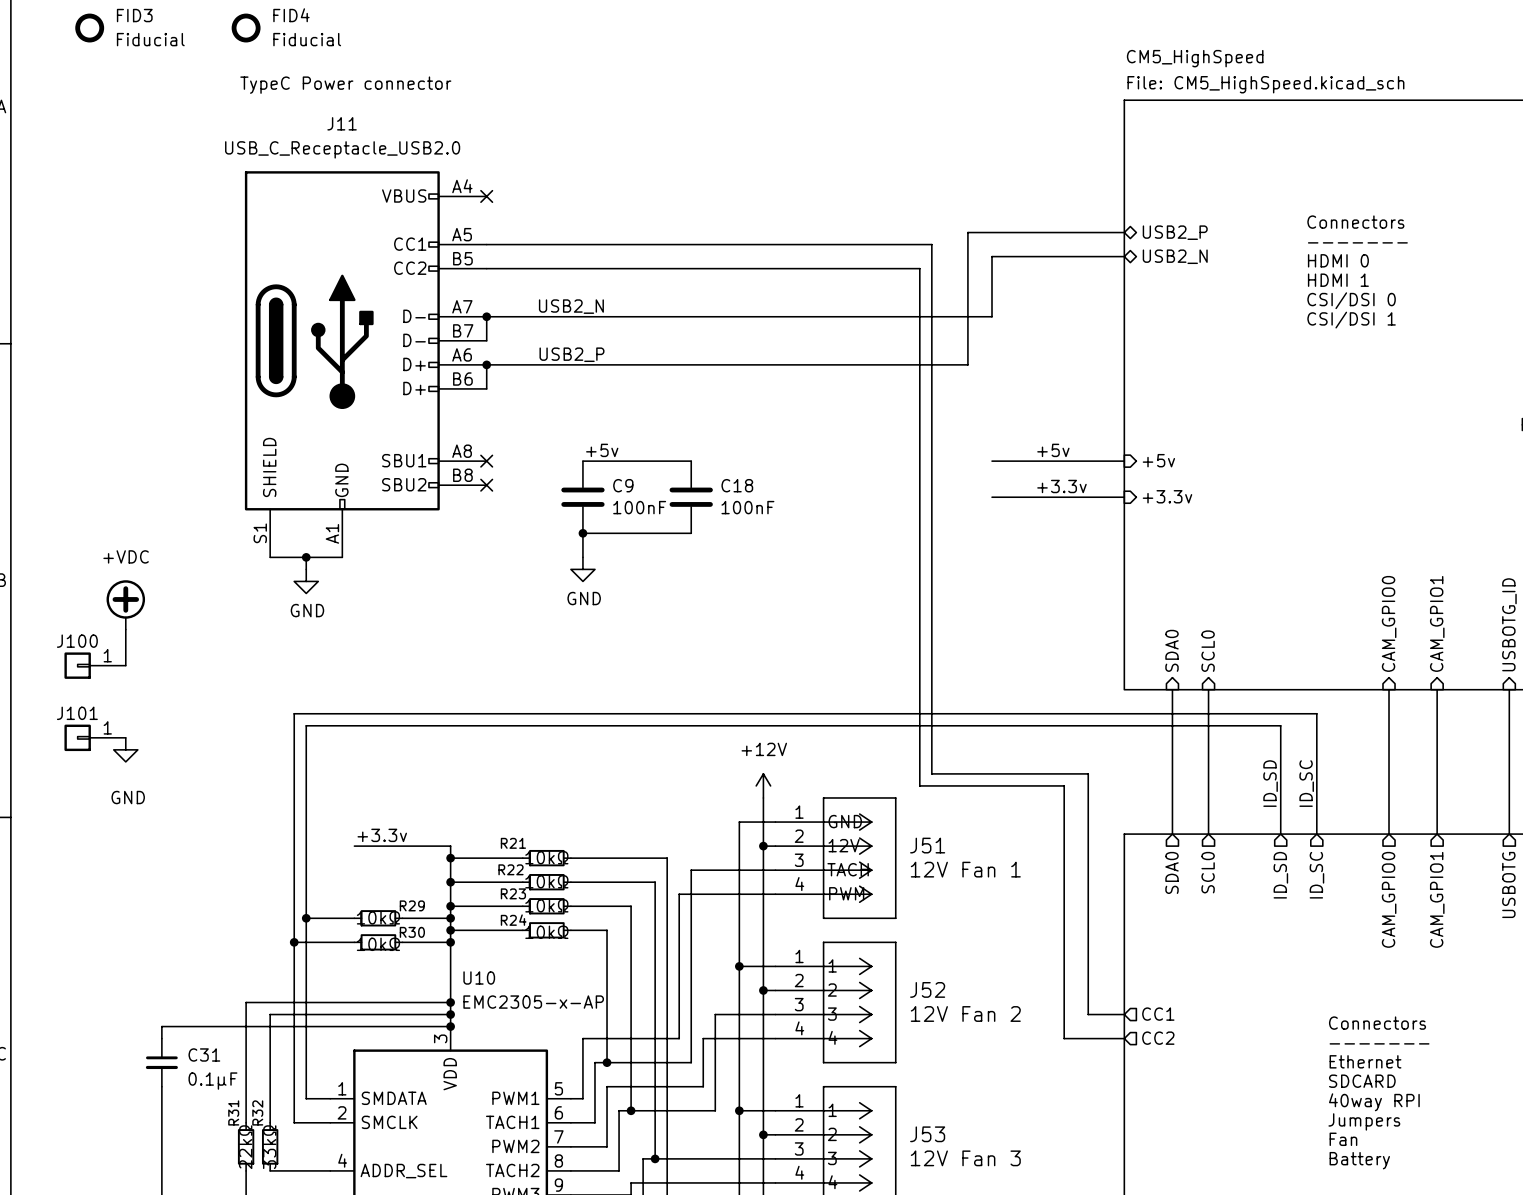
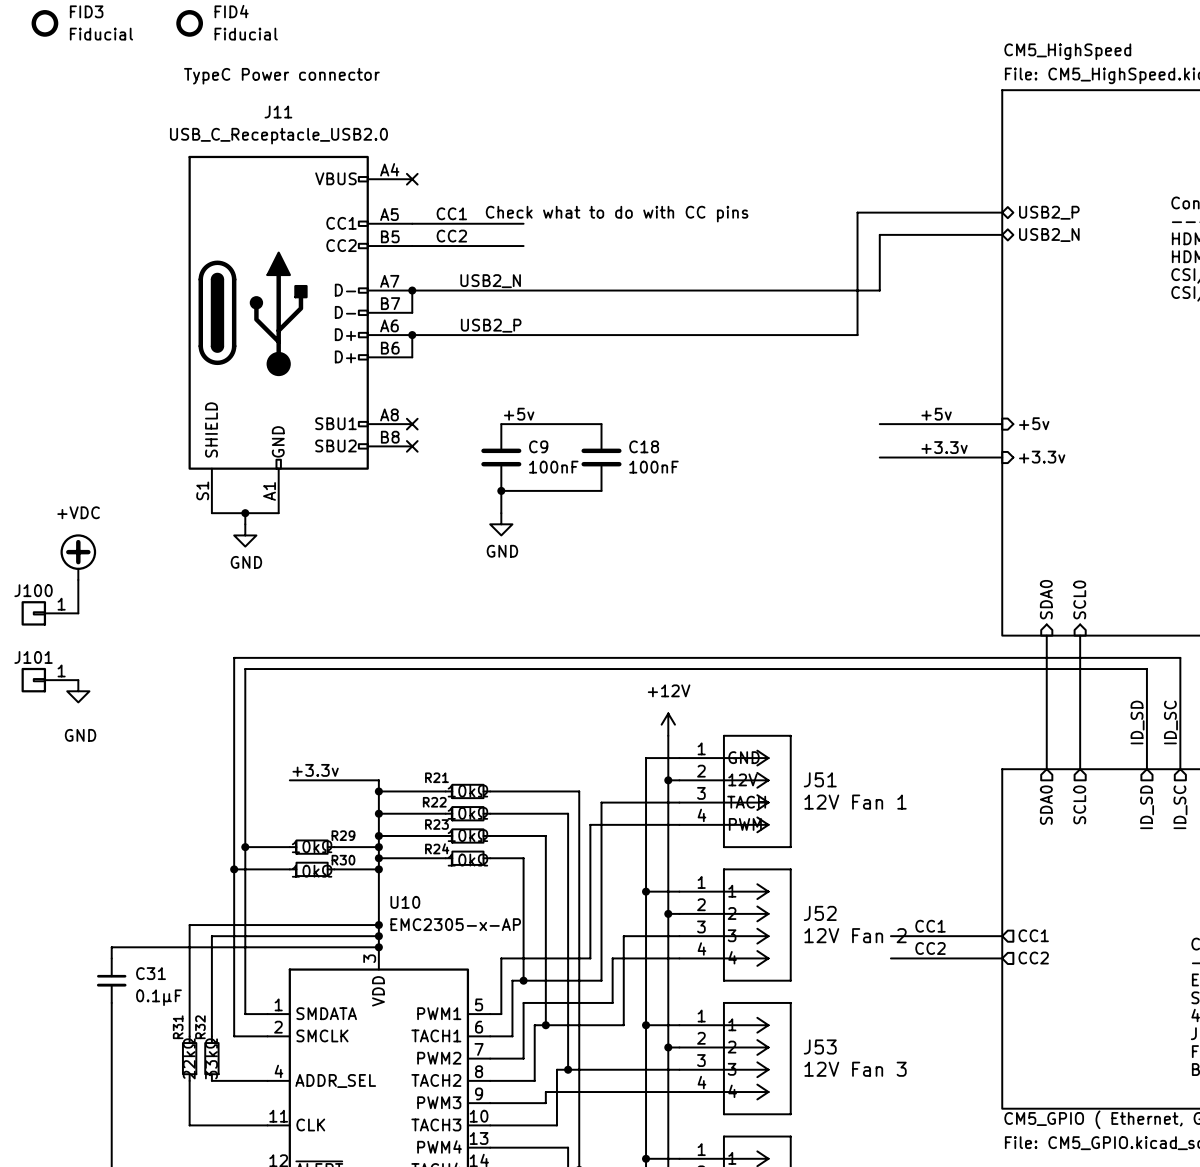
label: none -> CC1 (451, 213)
text: none -> Check what to do with CC pins (617, 214)
wire: (607, 244) (931, 244) (931, 773) (1088, 773) (1088, 1014) -> (890, 936) (968, 936)
label: none -> CC2 (451, 236)
wire: (607, 268) (919, 268) (919, 785) (1064, 785) (1064, 1038) -> (890, 958) (946, 958)
label: none -> CC1 (930, 926)
label: none -> CC2 (930, 948)

